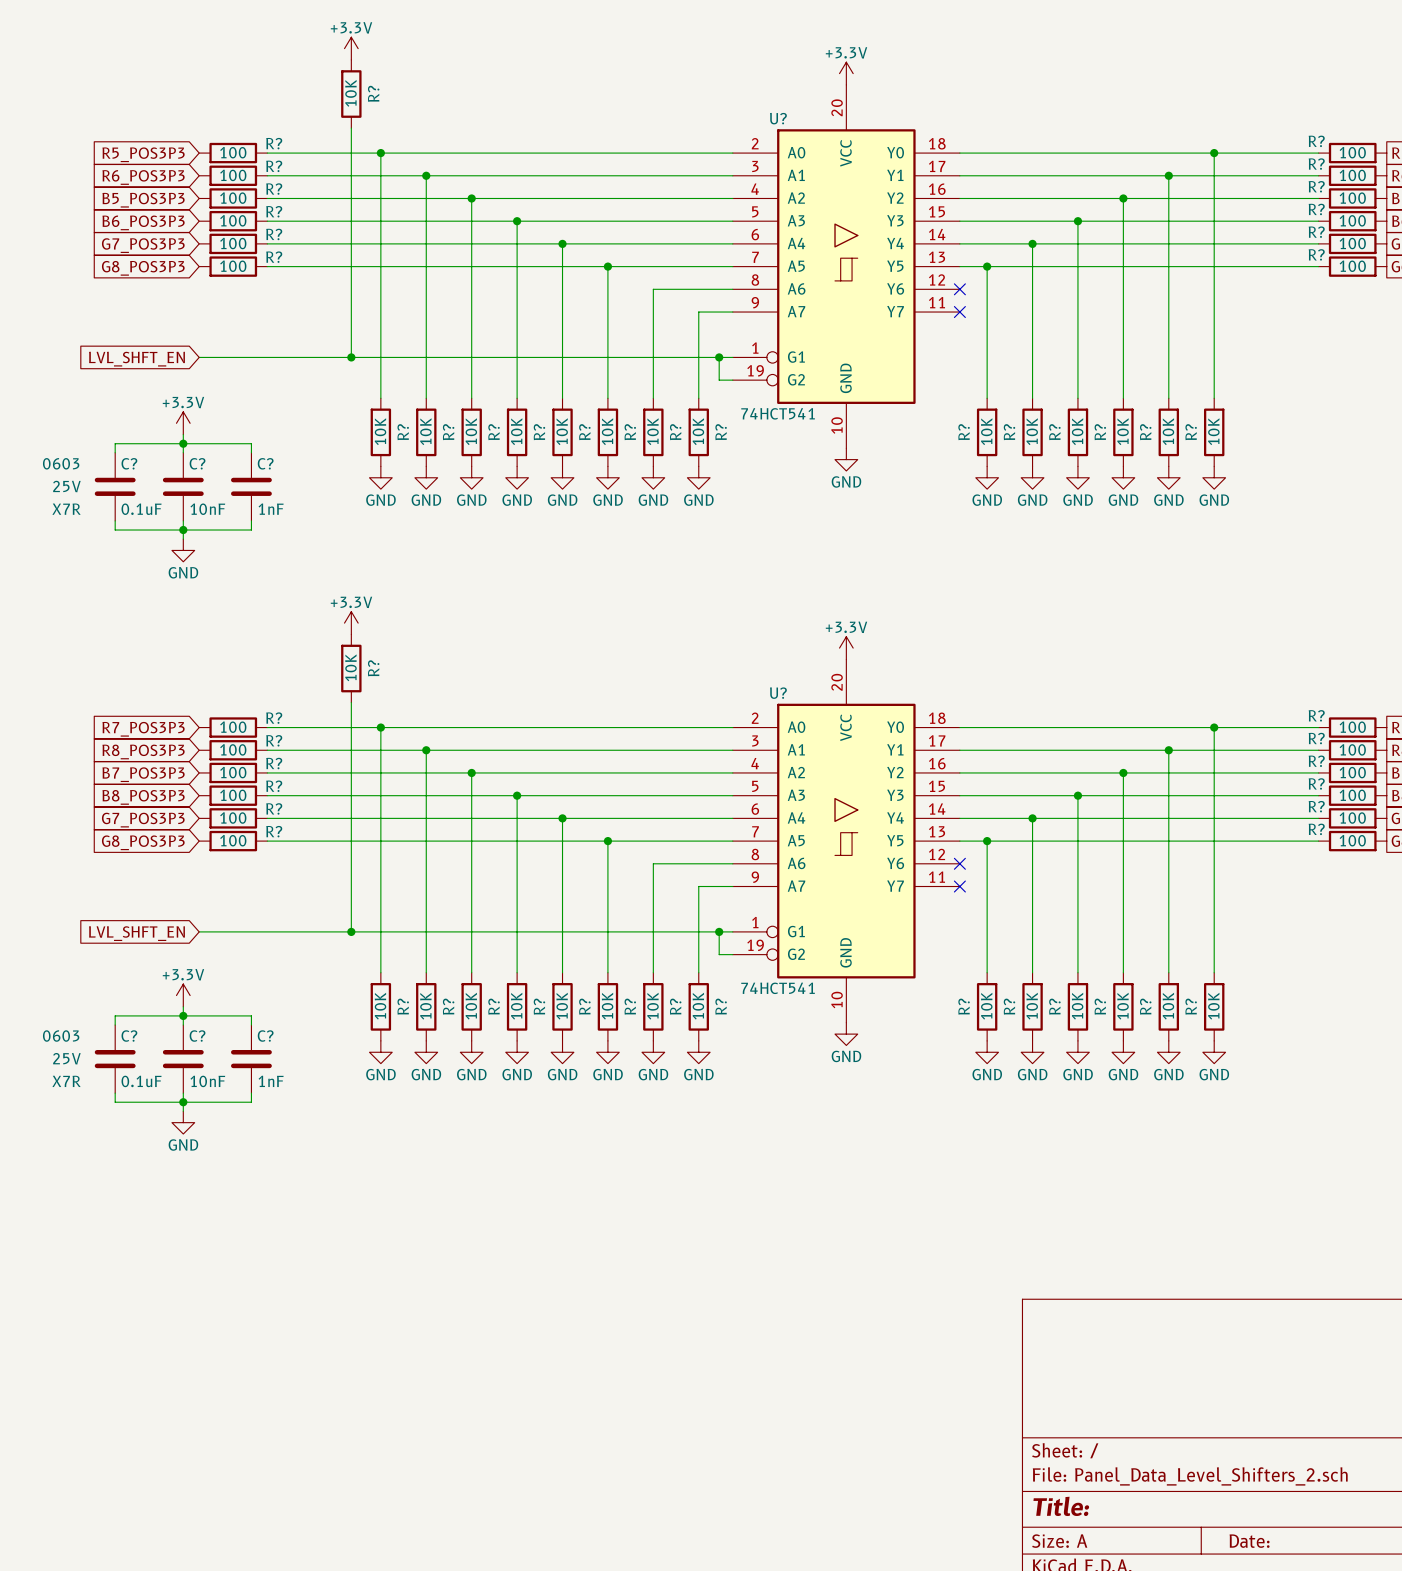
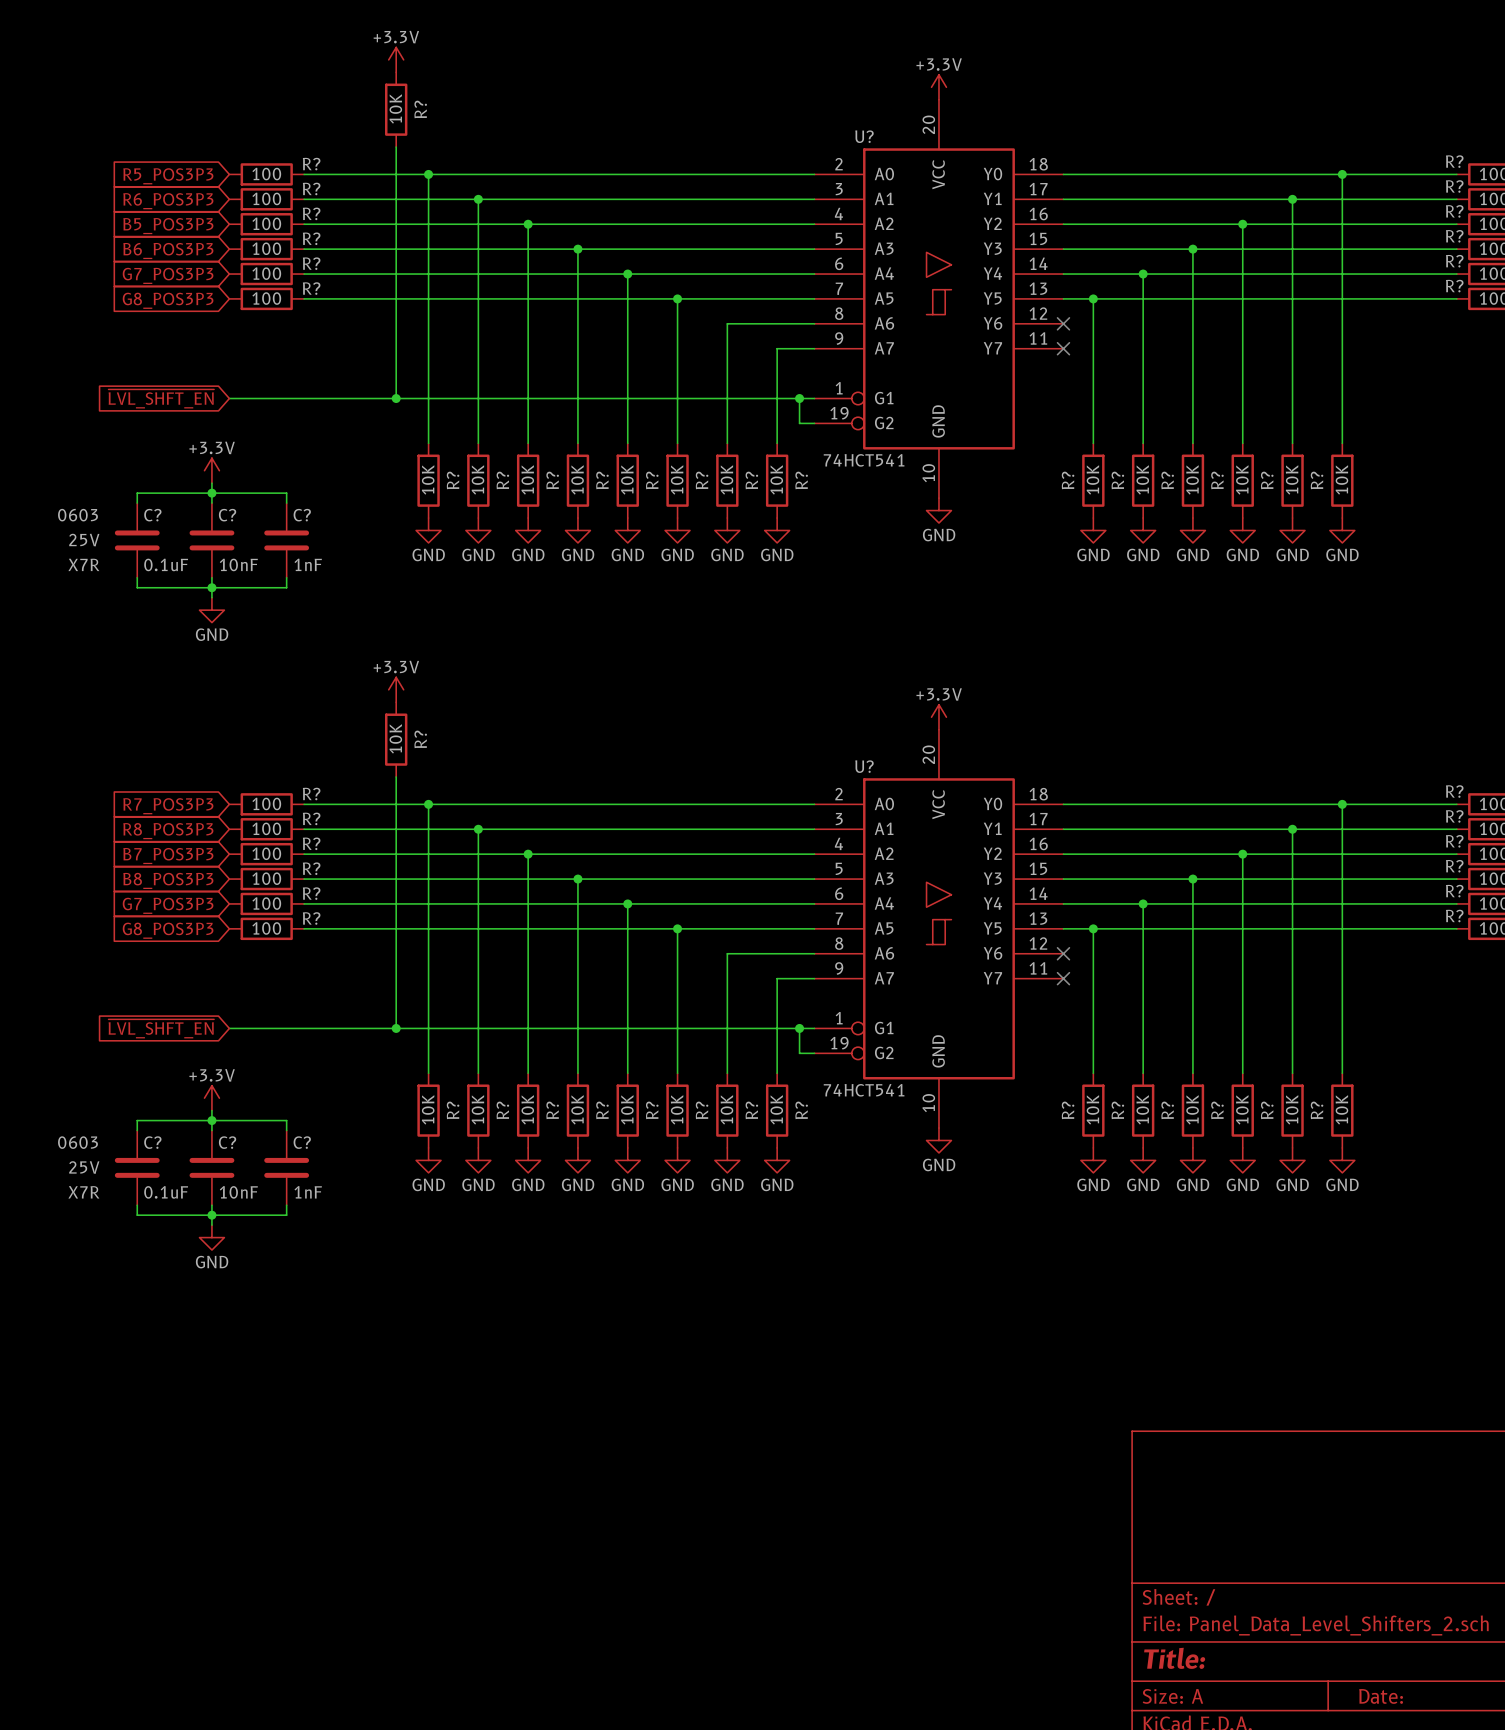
global label: LVL_SHFT_EN (136, 359) -> ~{LVL_SHFT_EN} (161, 398)
global label: LVL_SHFT_EN (136, 933) -> ~{LVL_SHFT_EN} (161, 1028)

